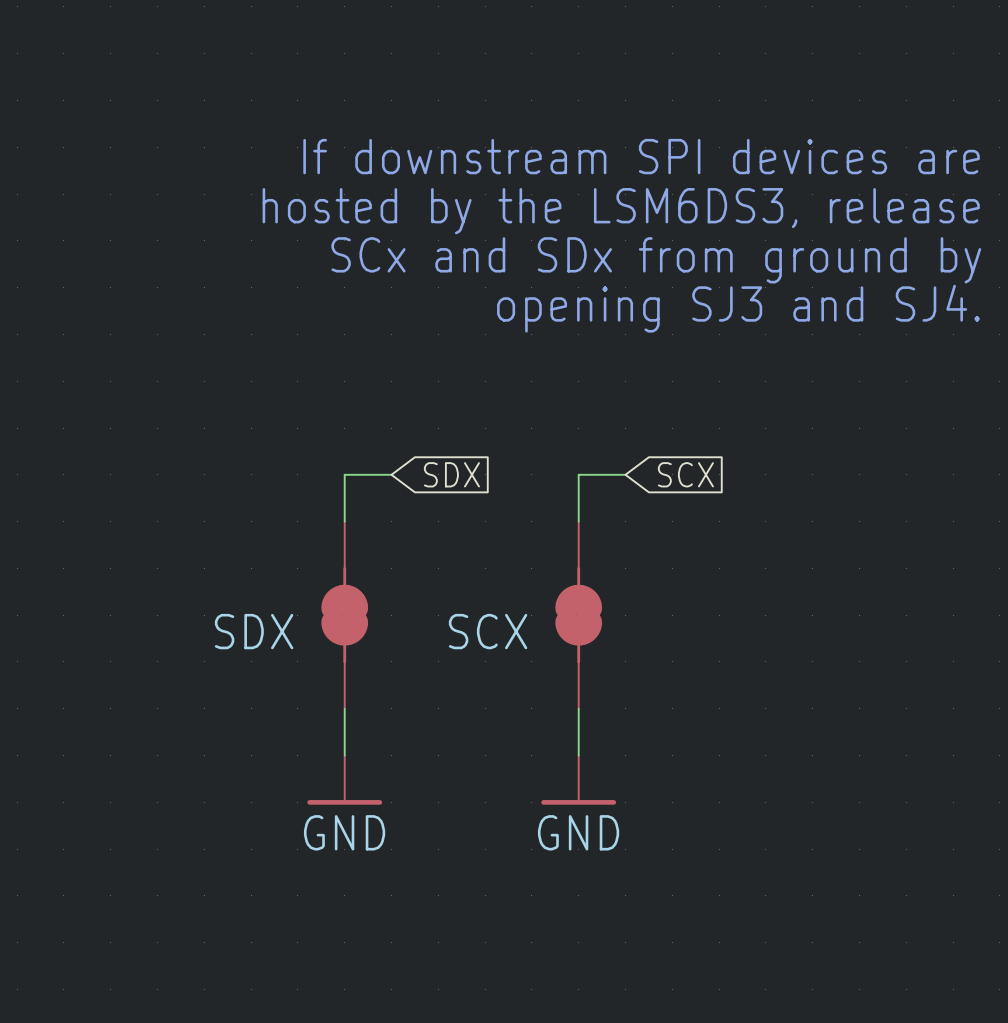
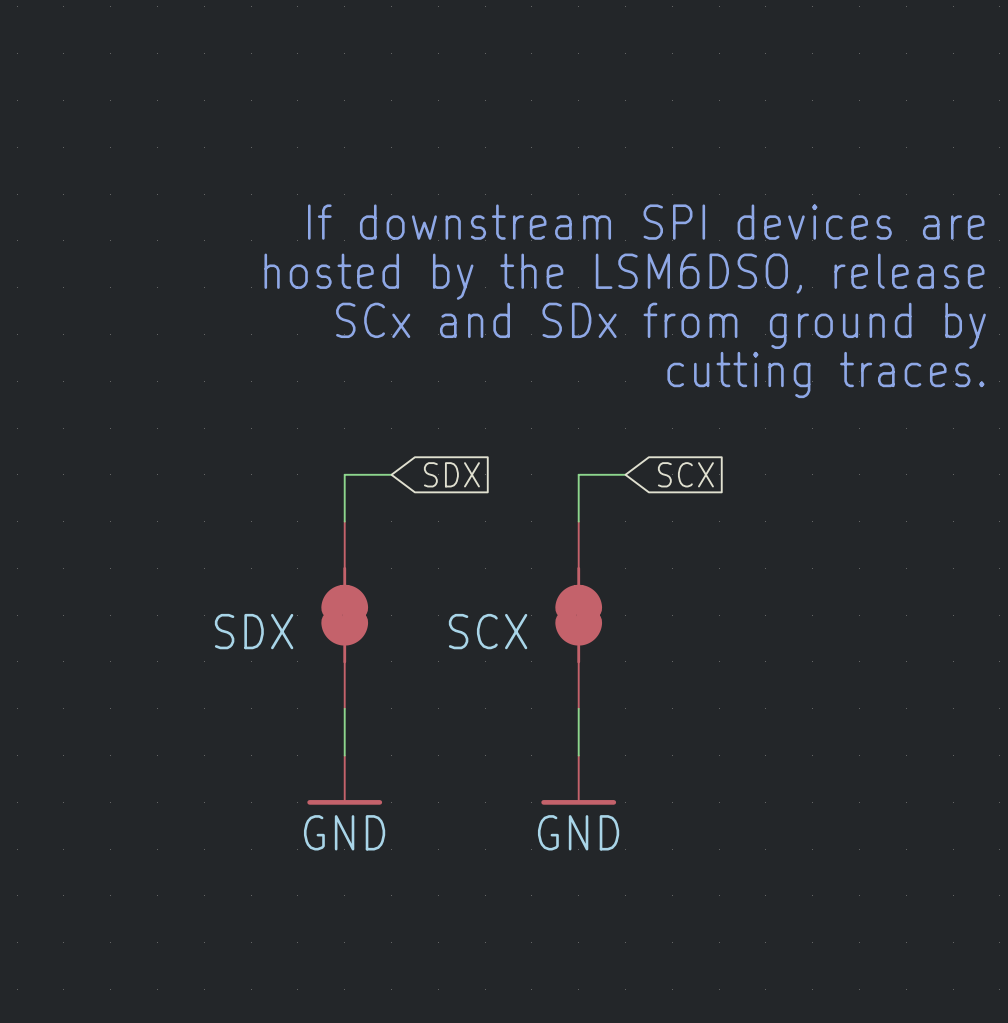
text position: If downstream SPI devices are (641, 156) -> If downstream SPI devices are (646, 222)
text: hosted by the LSM6DS3, release (621, 211) -> hosted by the LSM6DSO, release (624, 276)
text position: SCx and SDx from ground by (656, 260) -> SCx and SDx from ground by (660, 325)
text: opening SJ3 and SJ4. (738, 308) -> none
text: none -> cutting traces. (825, 374)

